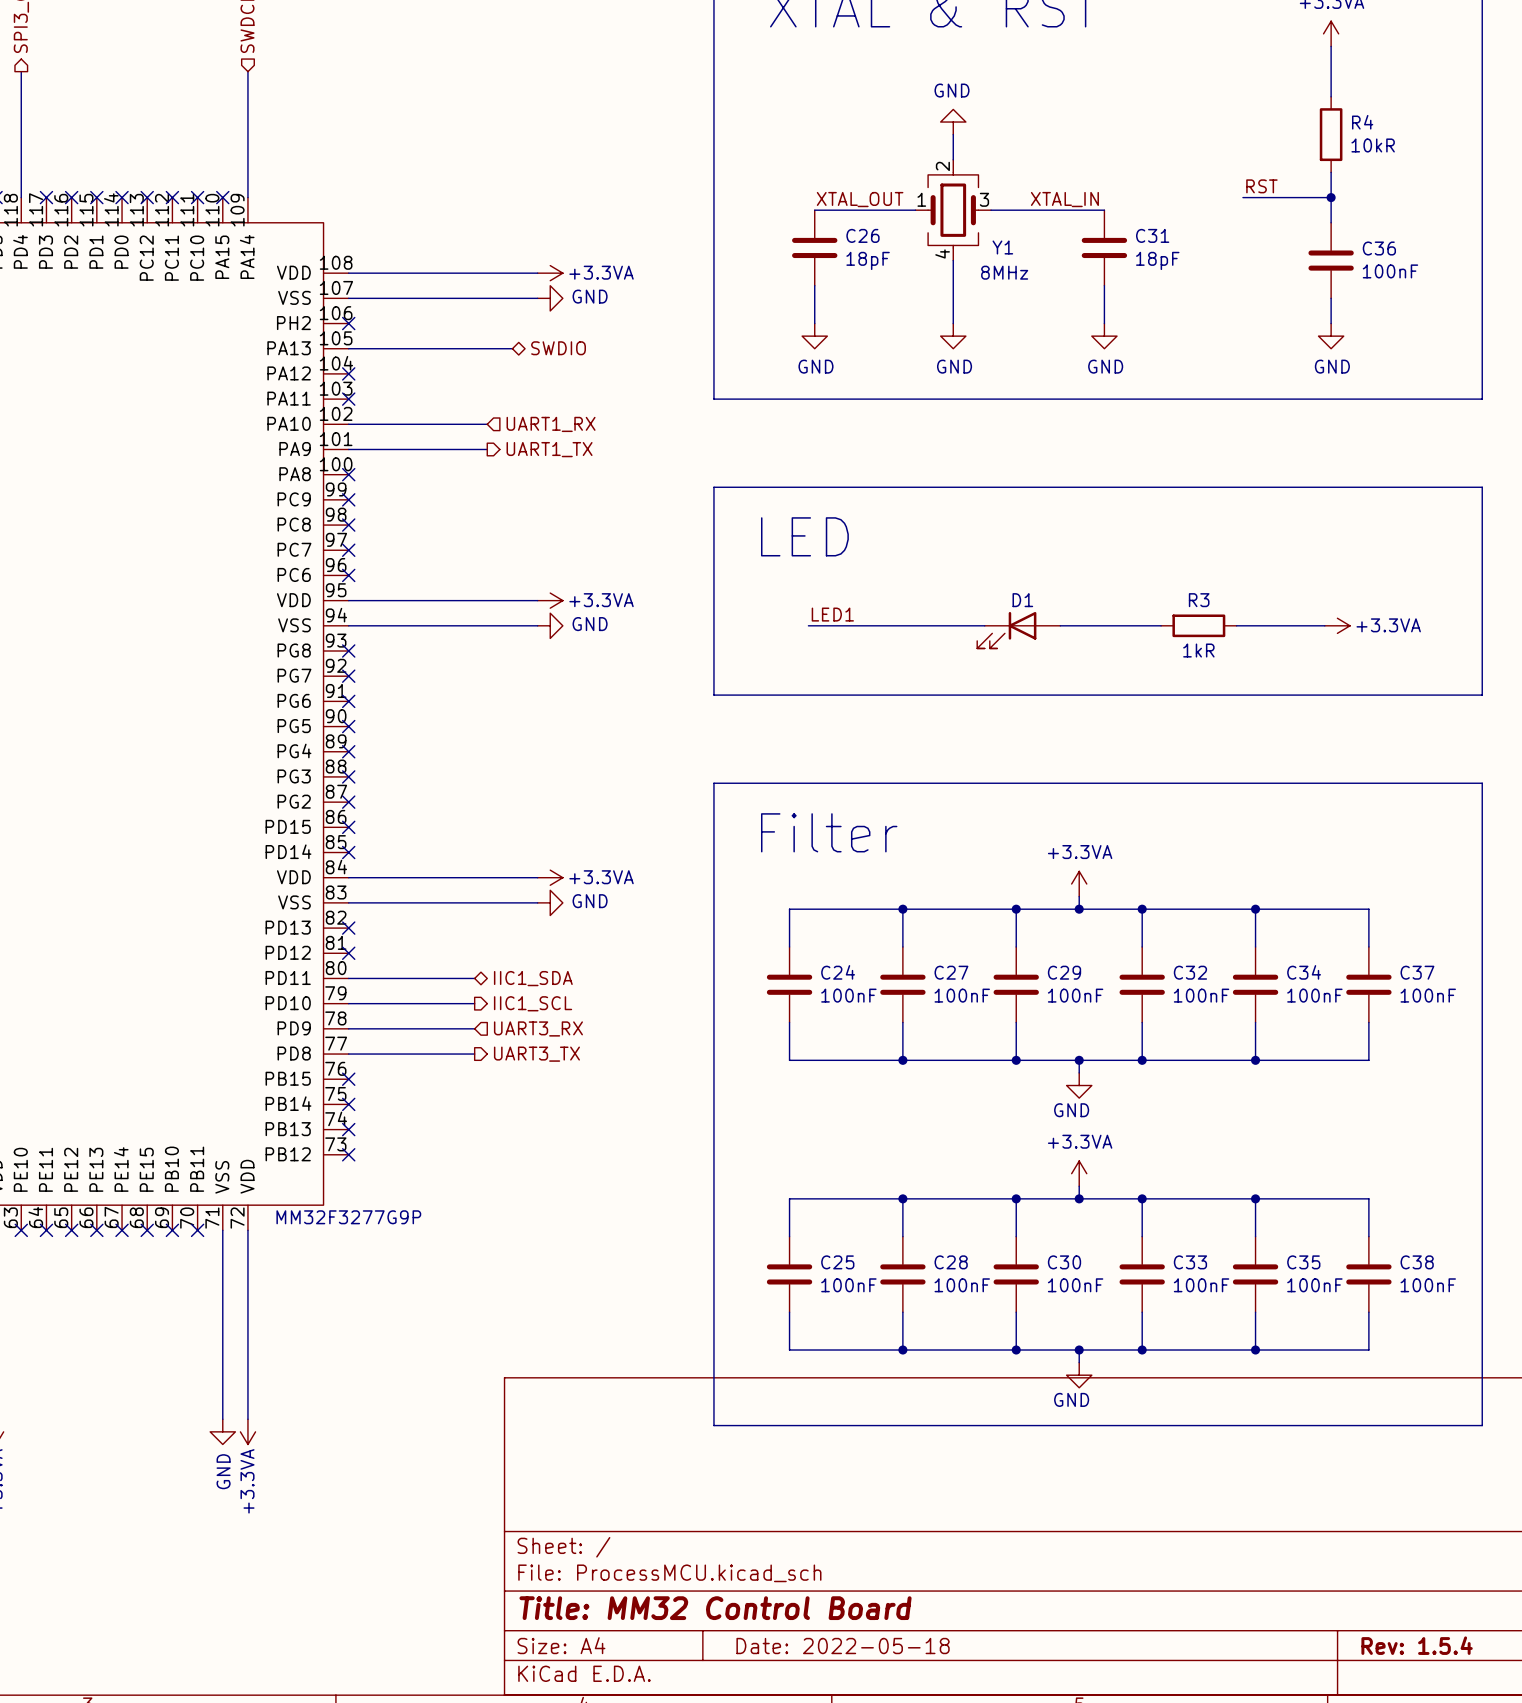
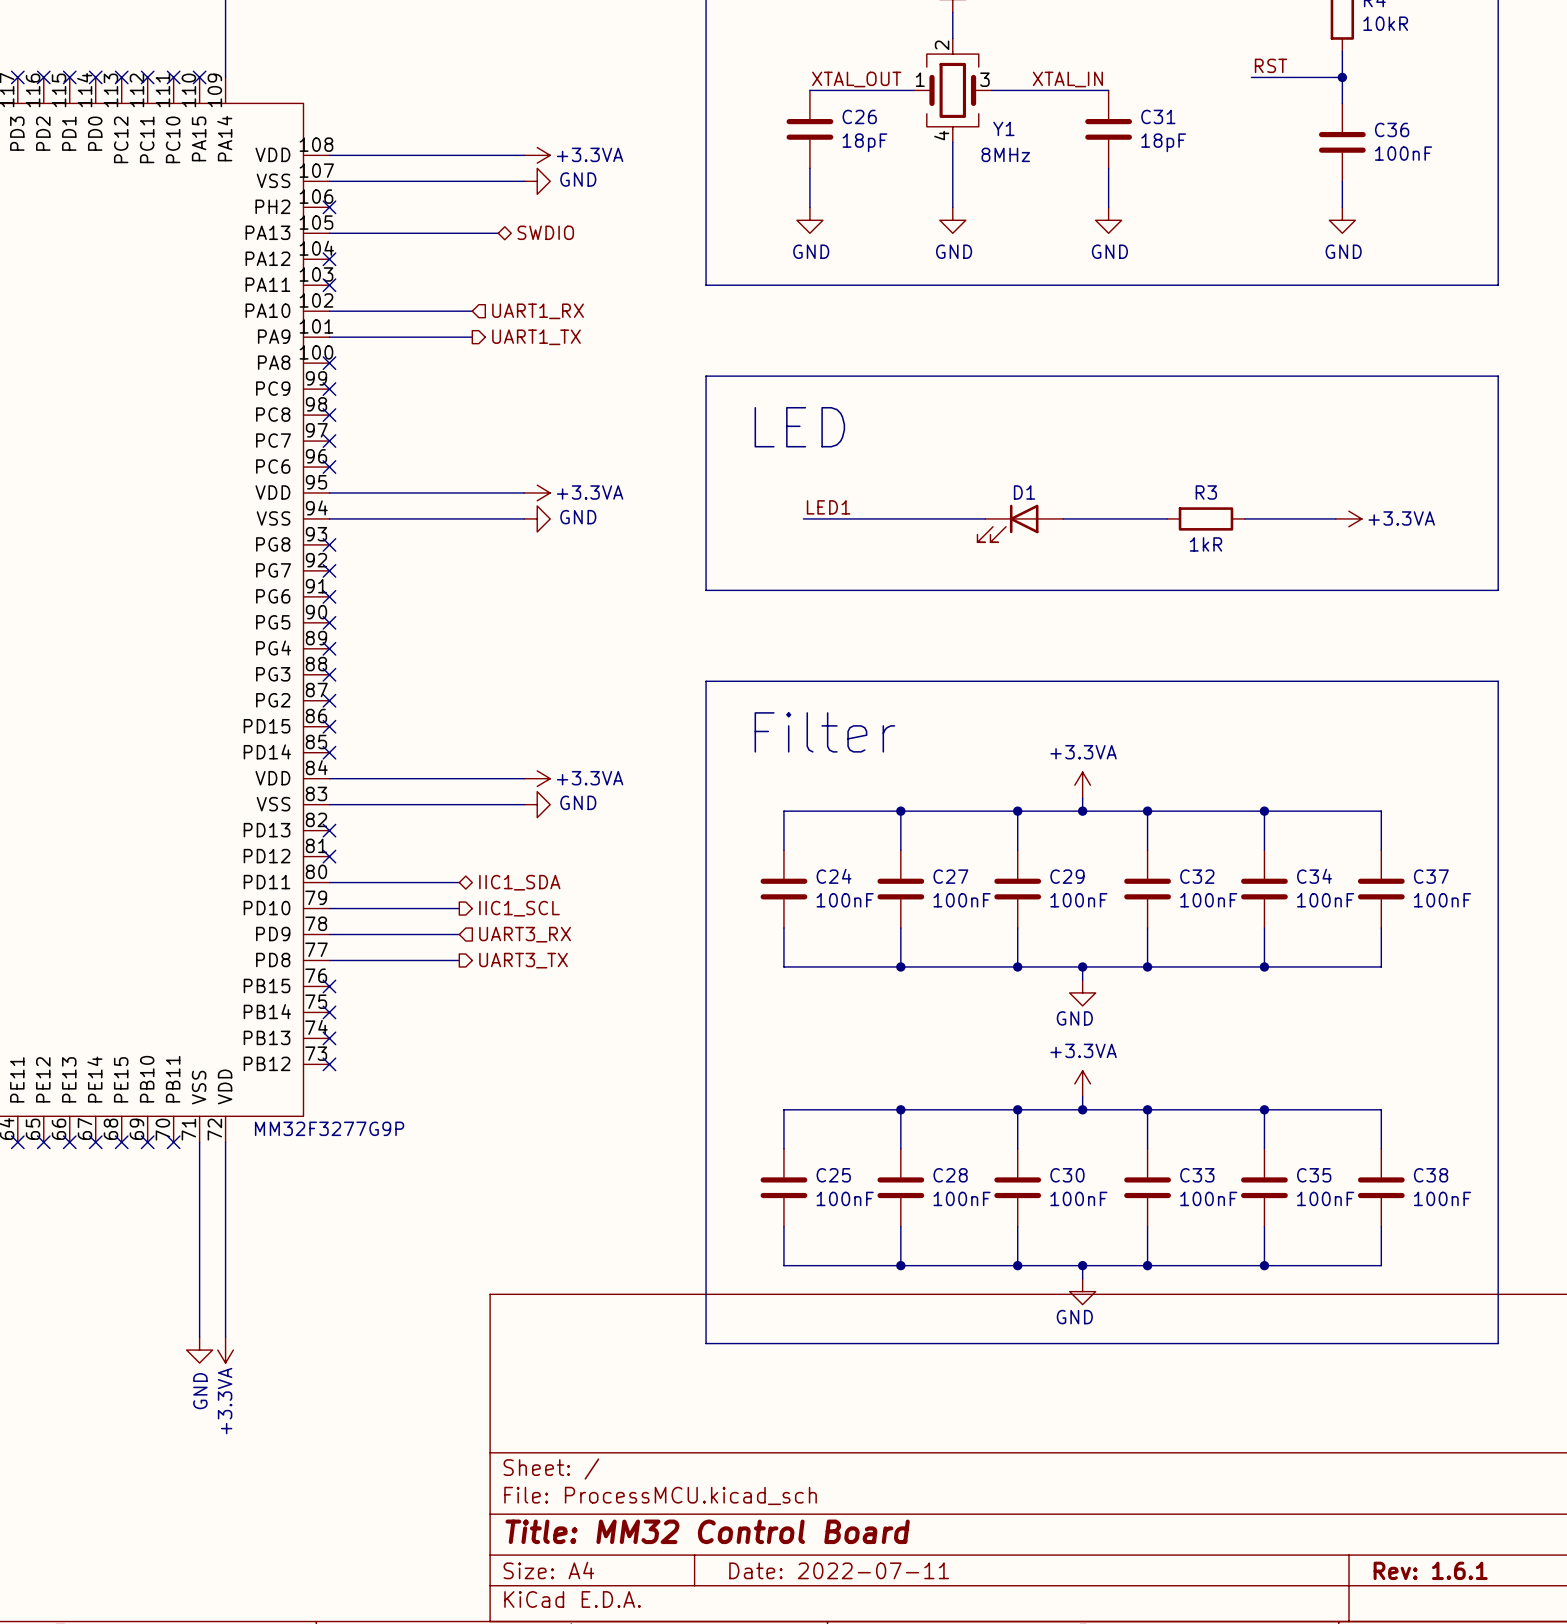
title block: Rev: 1.5.4 (1417, 1645) -> Rev: 1.6.1 (1430, 1570)
title block: Date: 2022-05-18 (843, 1646) -> Date: 2022-07-11 (839, 1570)

